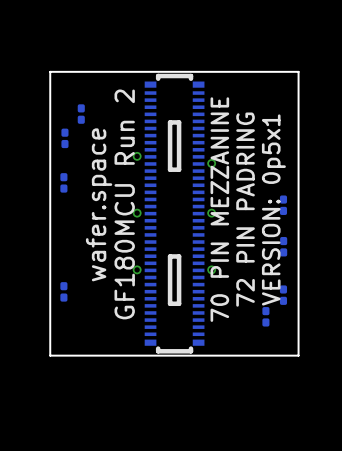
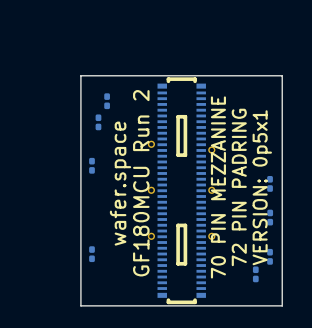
part: none -> (107, 101)
part: (81, 114) -> none
part: none -> (98, 122)
part: (64, 138) -> none

